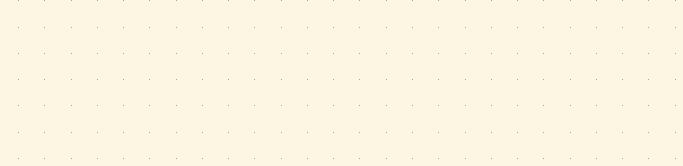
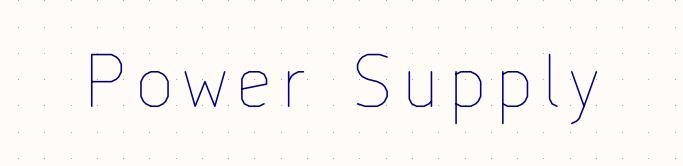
text: none -> Power Supply (344, 89)

